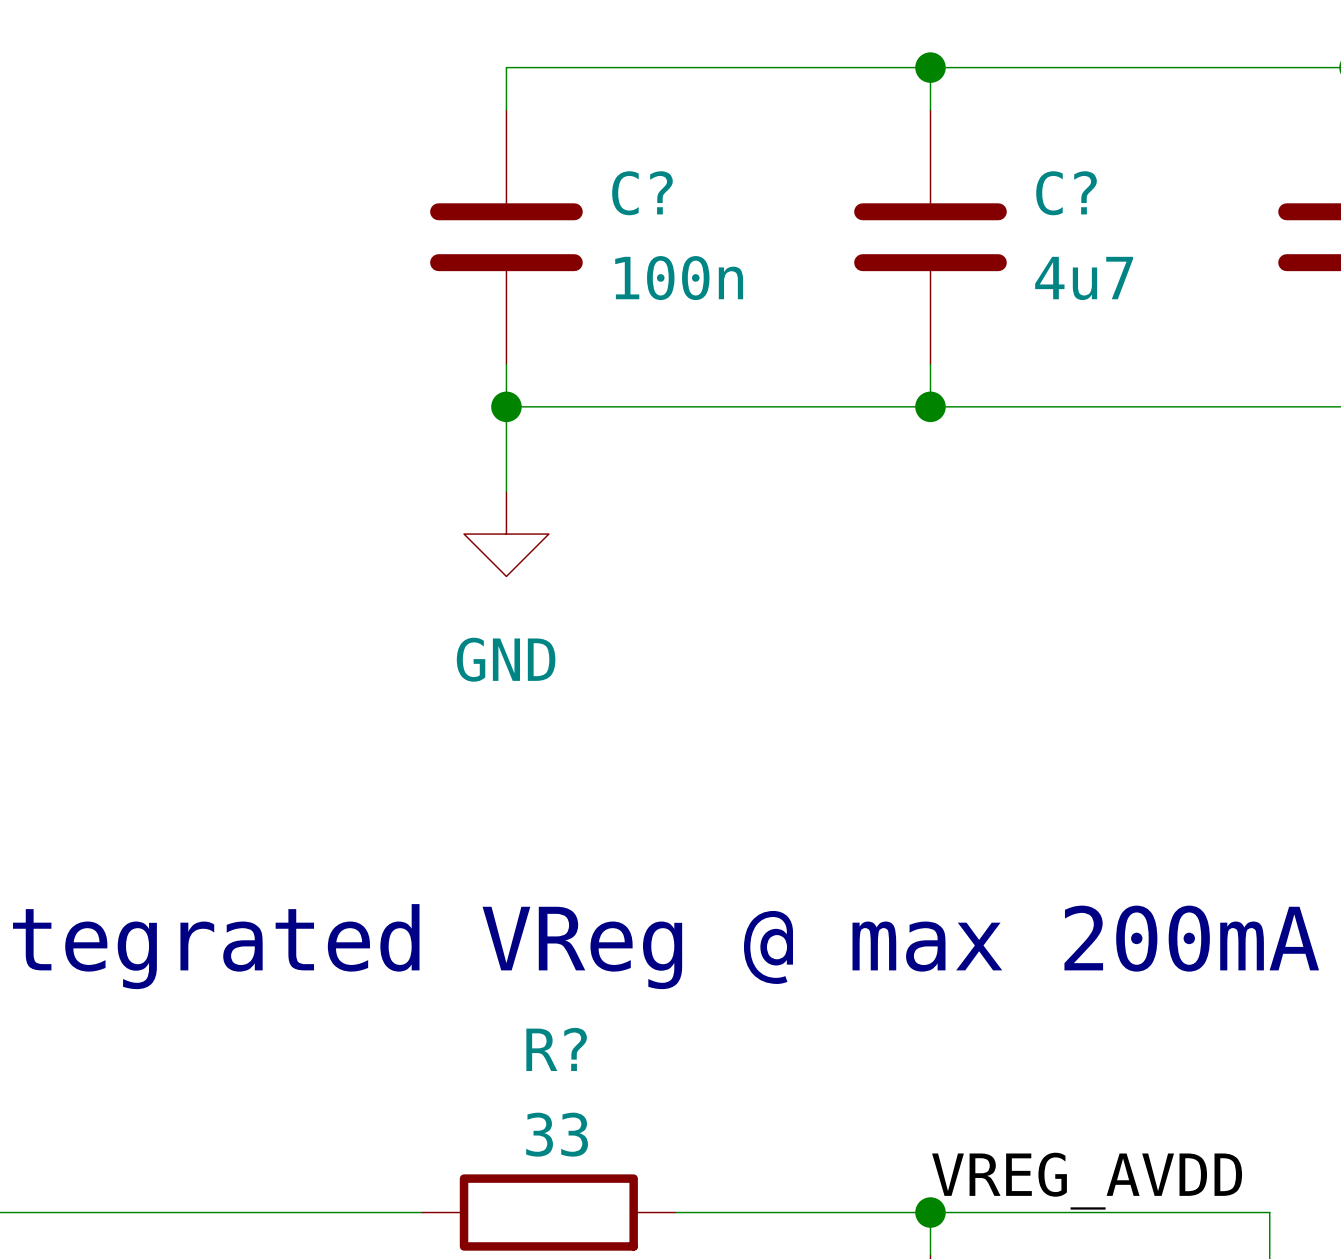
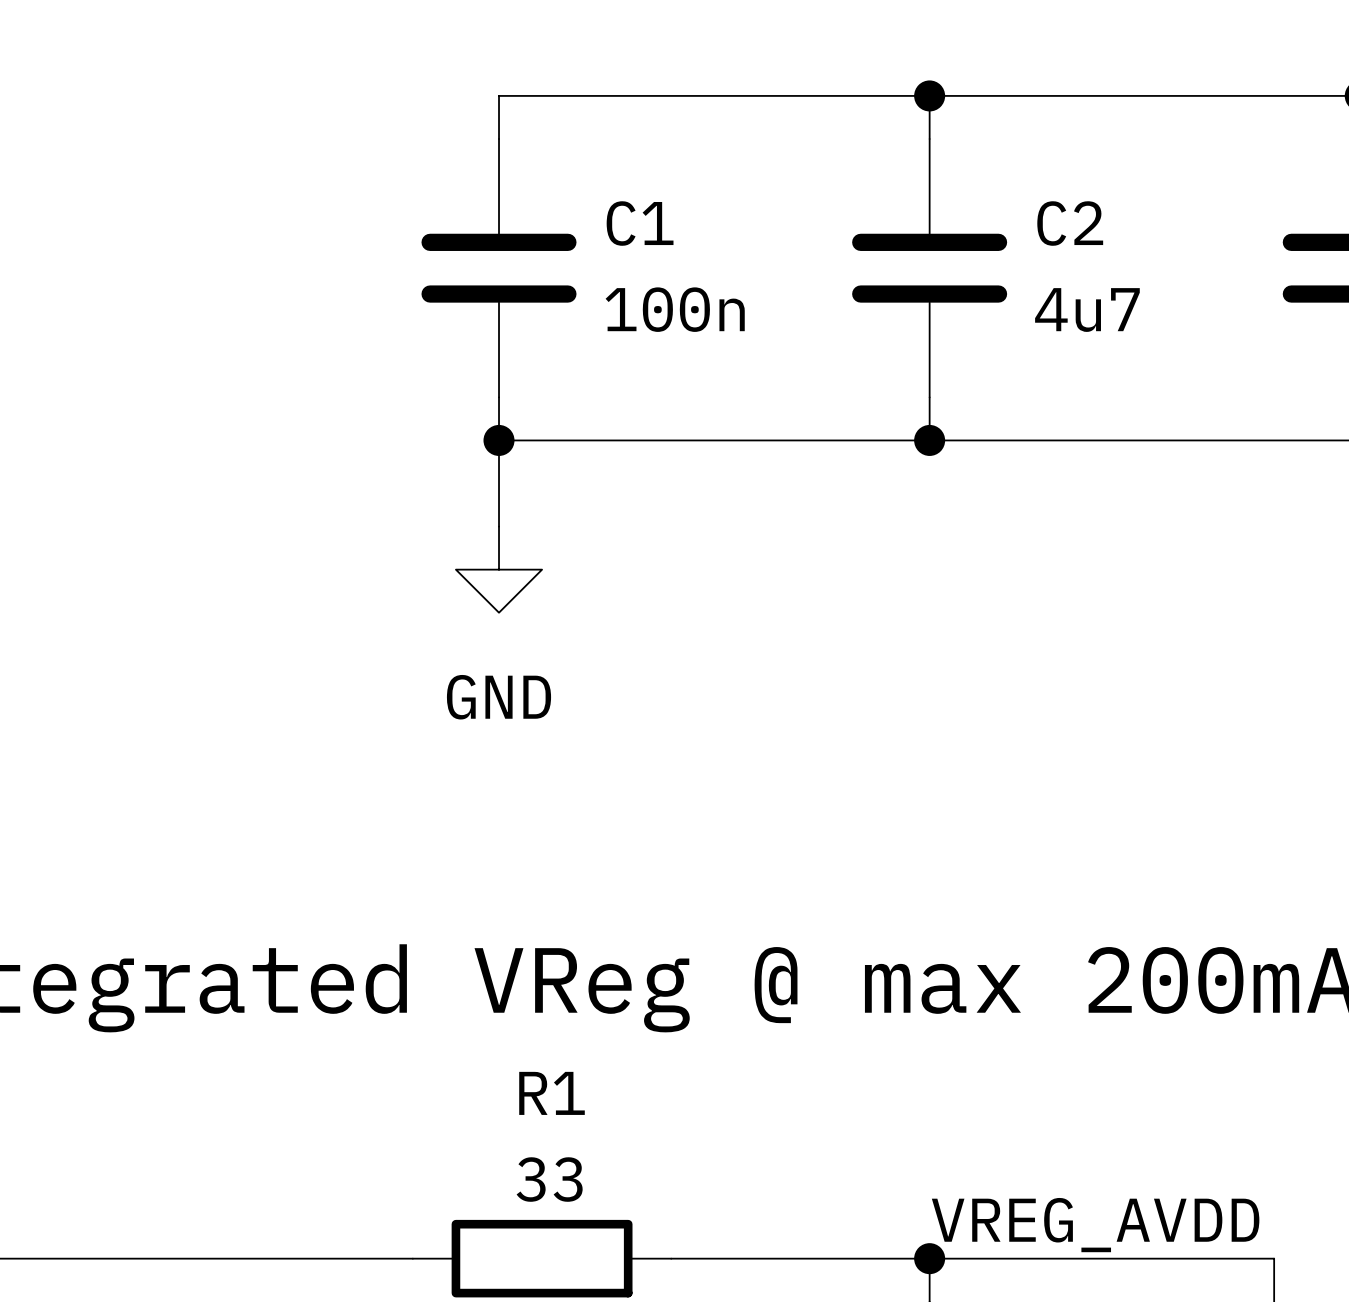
C? name: C? (642, 193) -> C1 (640, 223)
C? name: C? (1066, 193) -> C2 (1070, 223)
R? name: R? (556, 1049) -> R1 (552, 1093)

